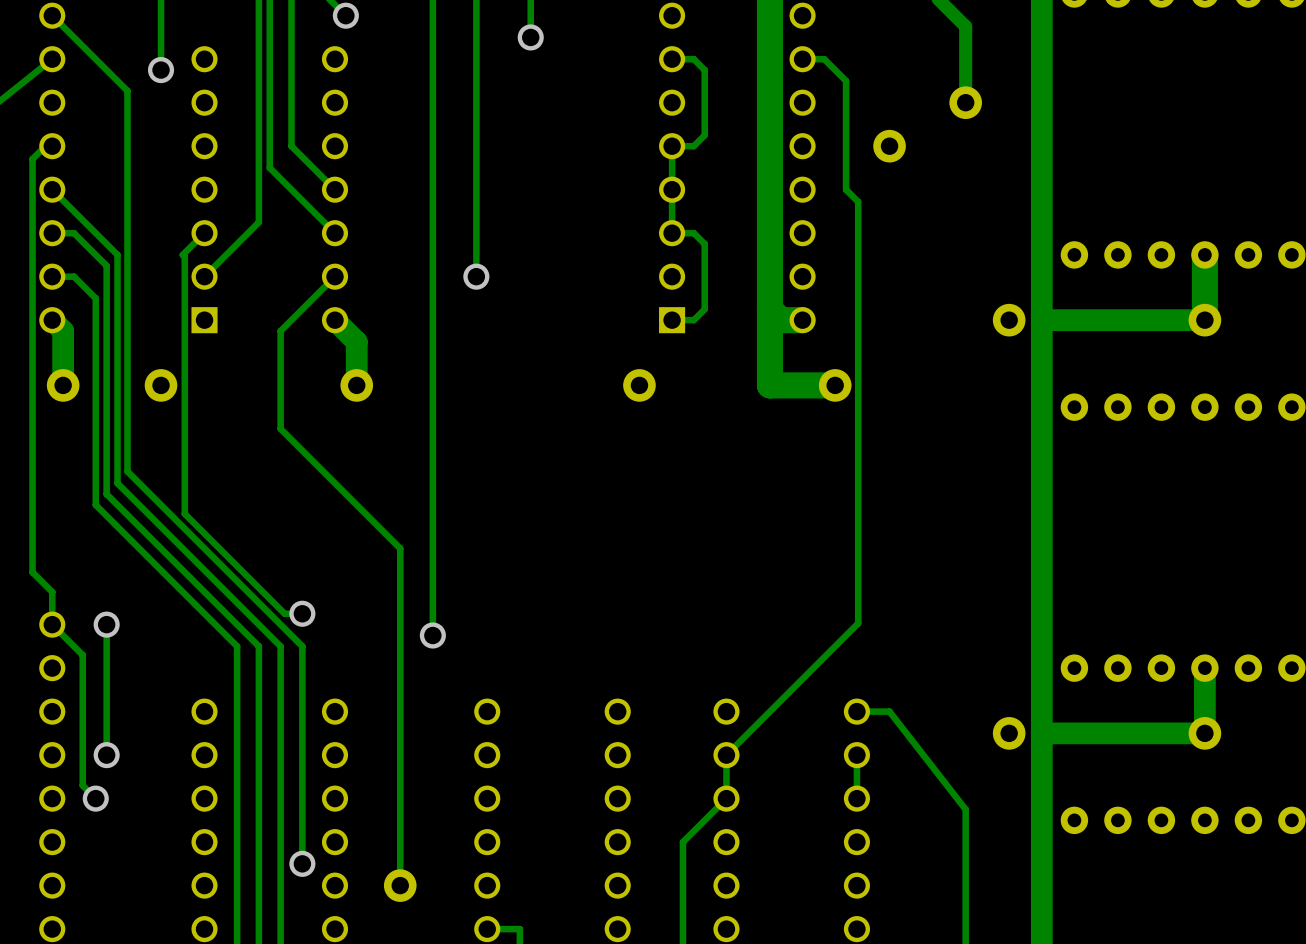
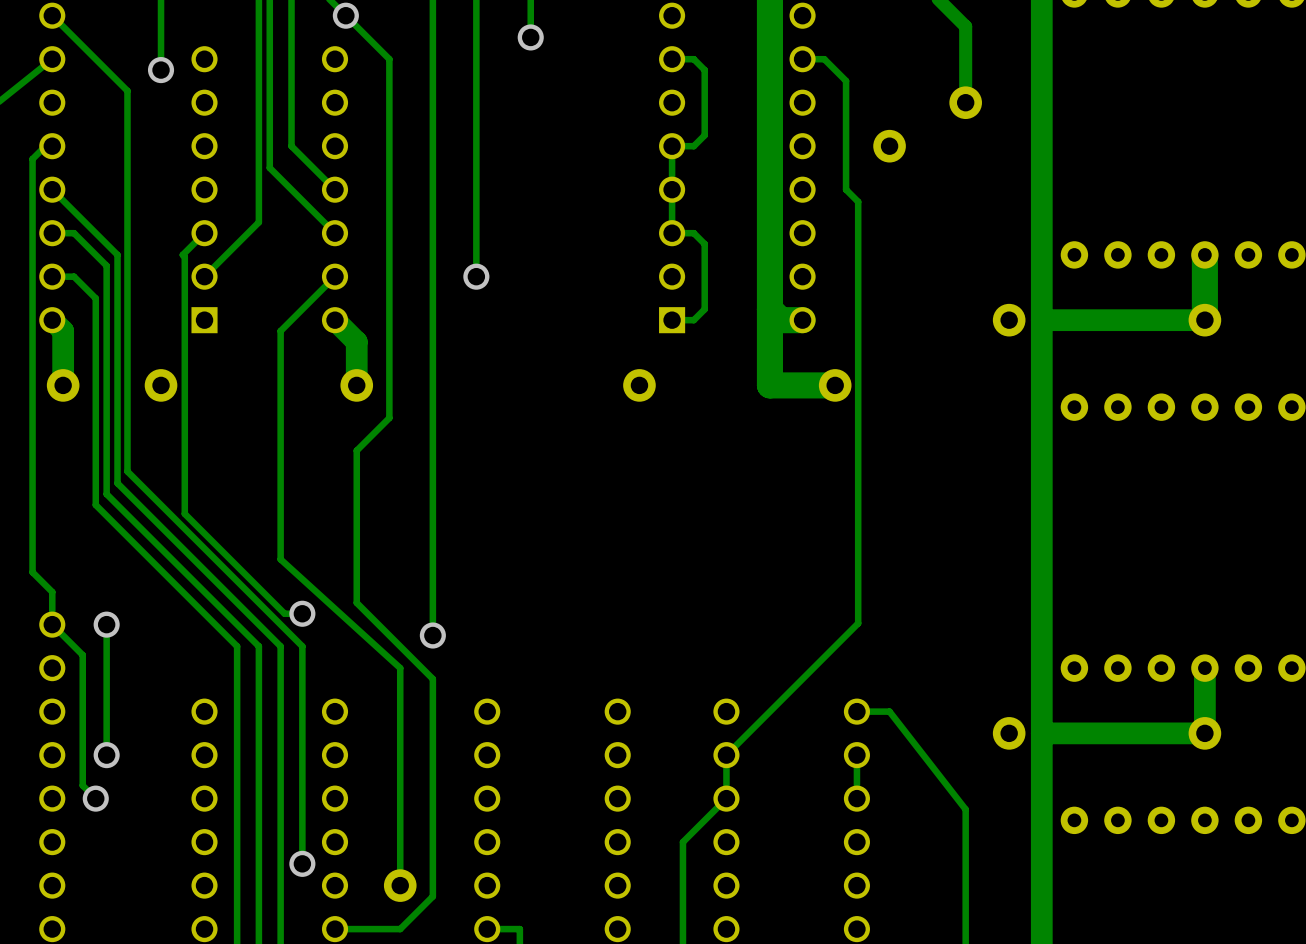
track: none -> (345, 15) (389, 59) (389, 418) (356, 450) (356, 602) (432, 679) (432, 896) (400, 929) (335, 929)
track: (280, 428) (400, 548) (400, 668) -> (280, 428) (280, 559) (400, 668)

